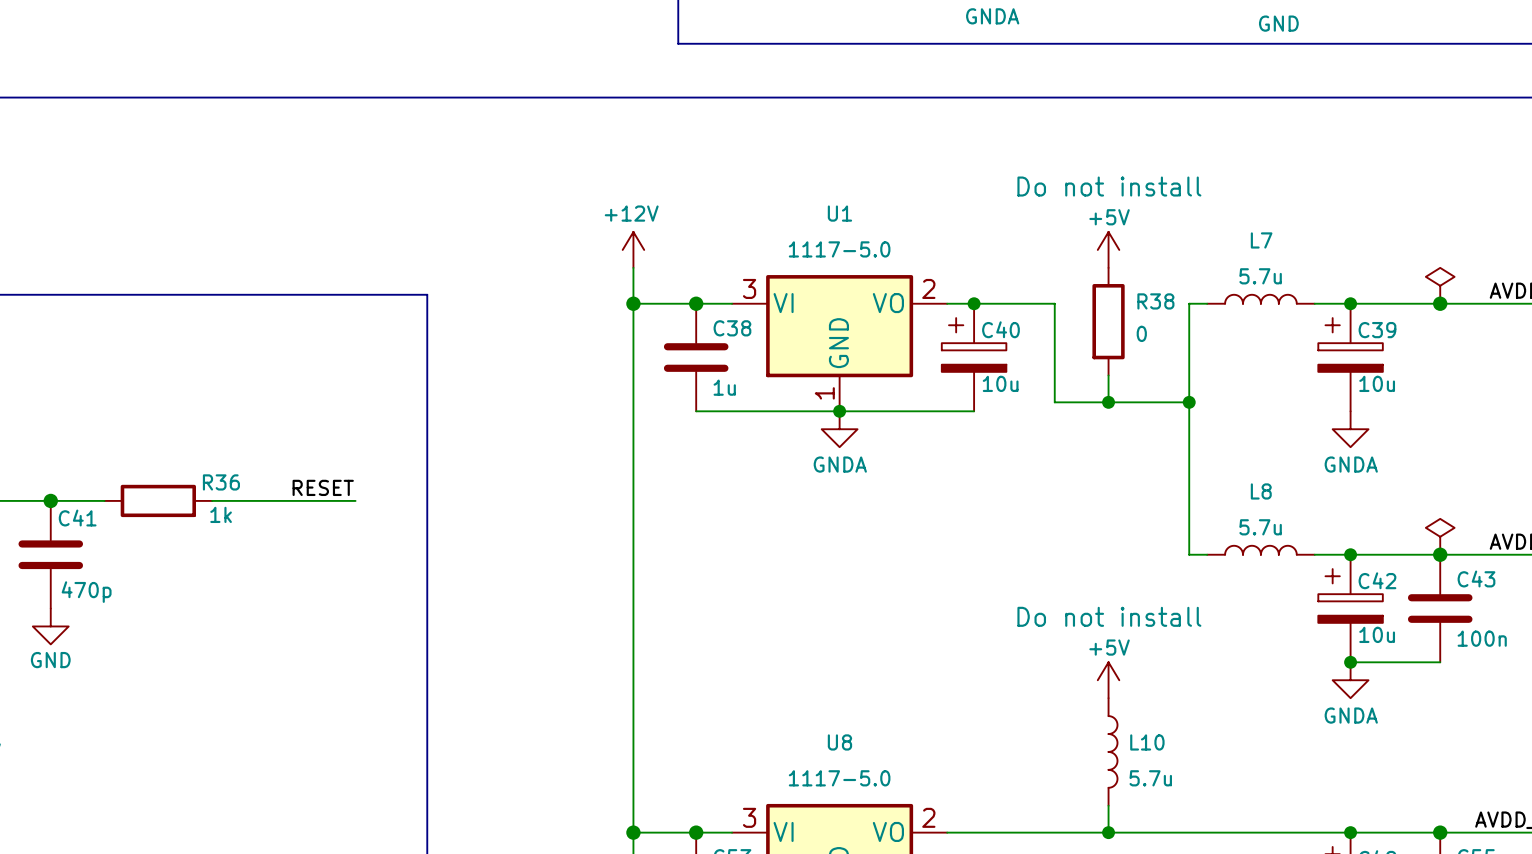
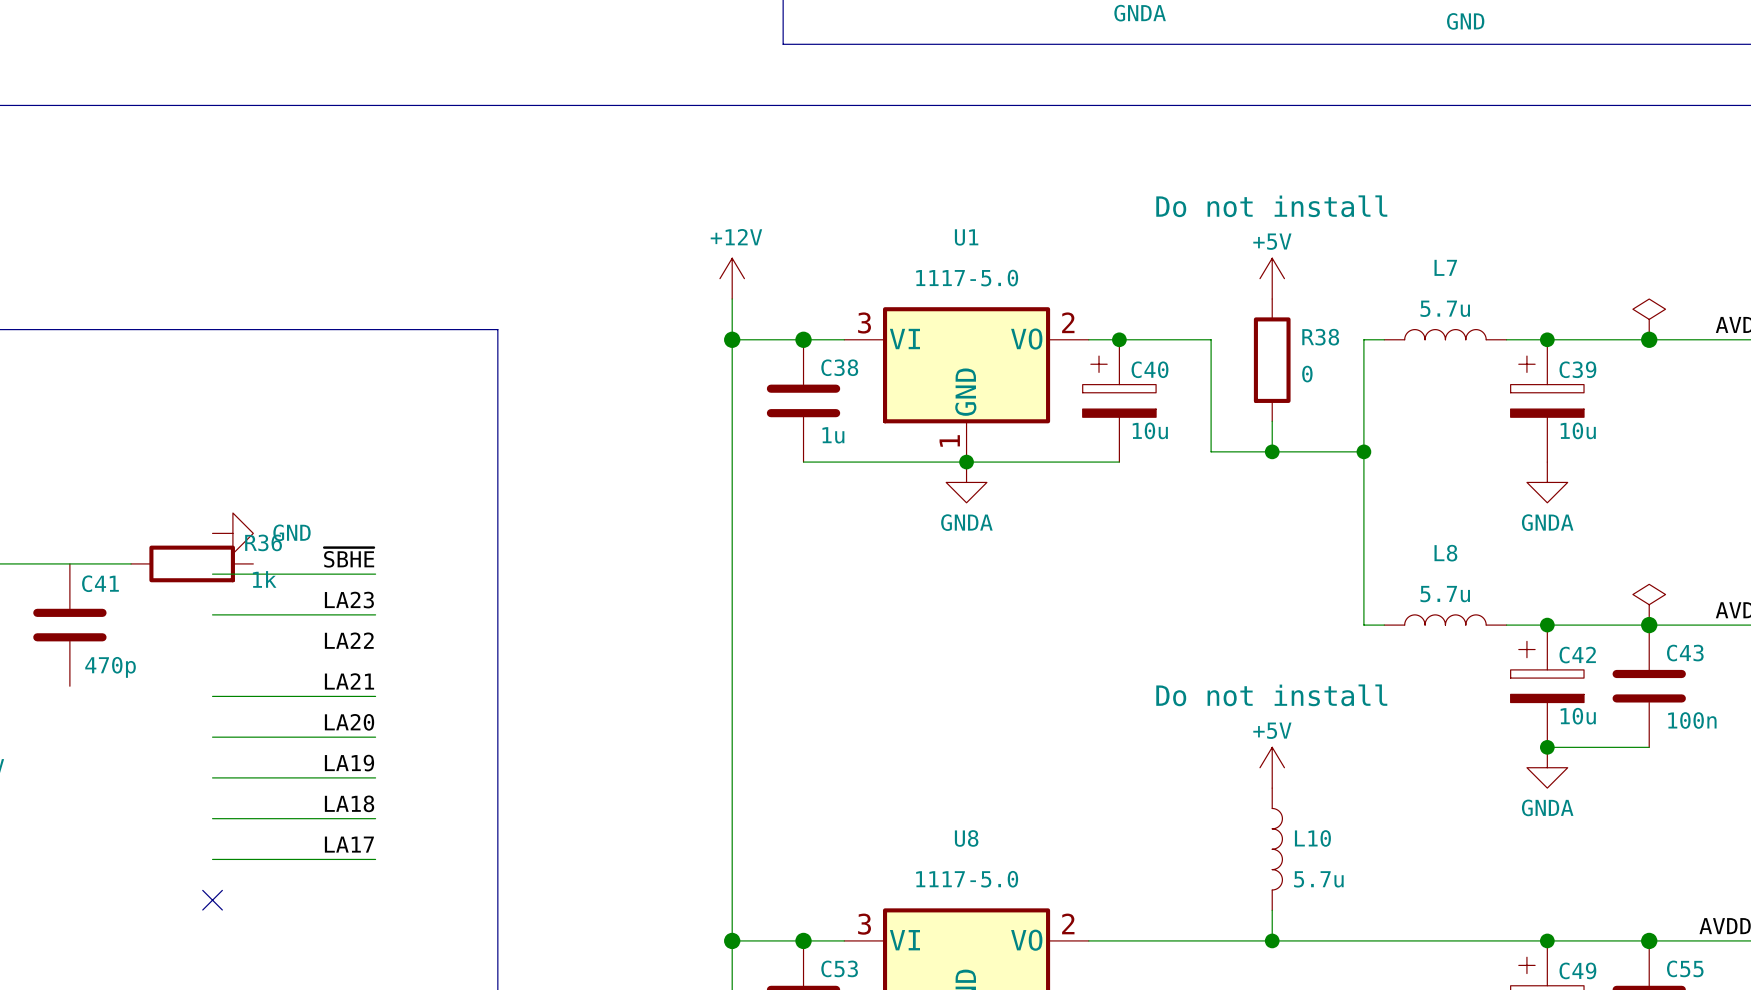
power symbol: none -> GND (232, 533)
label: RESET (323, 487) -> none
label: none -> ~{SBHE} (349, 557)
junction: (50, 500) -> none
wire: (212, 500) (355, 500) -> (212, 574) (375, 574)
label: none -> LA23 (349, 600)
wire: none -> (212, 614) (375, 614)
label: none -> LA22 (349, 640)
label: none -> LA21 (349, 681)
wire: none -> (212, 696) (375, 696)
power symbol: GND (50, 626) -> none
label: none -> LA20 (349, 722)
wire: none -> (212, 737) (375, 737)
label: none -> LA19 (349, 763)
wire: none -> (212, 777) (375, 777)
label: none -> LA18 (349, 803)
wire: none -> (212, 818) (375, 818)
label: none -> LA17 (349, 844)
wire: none -> (212, 859) (375, 859)
no-connect mark: none -> (212, 900)

